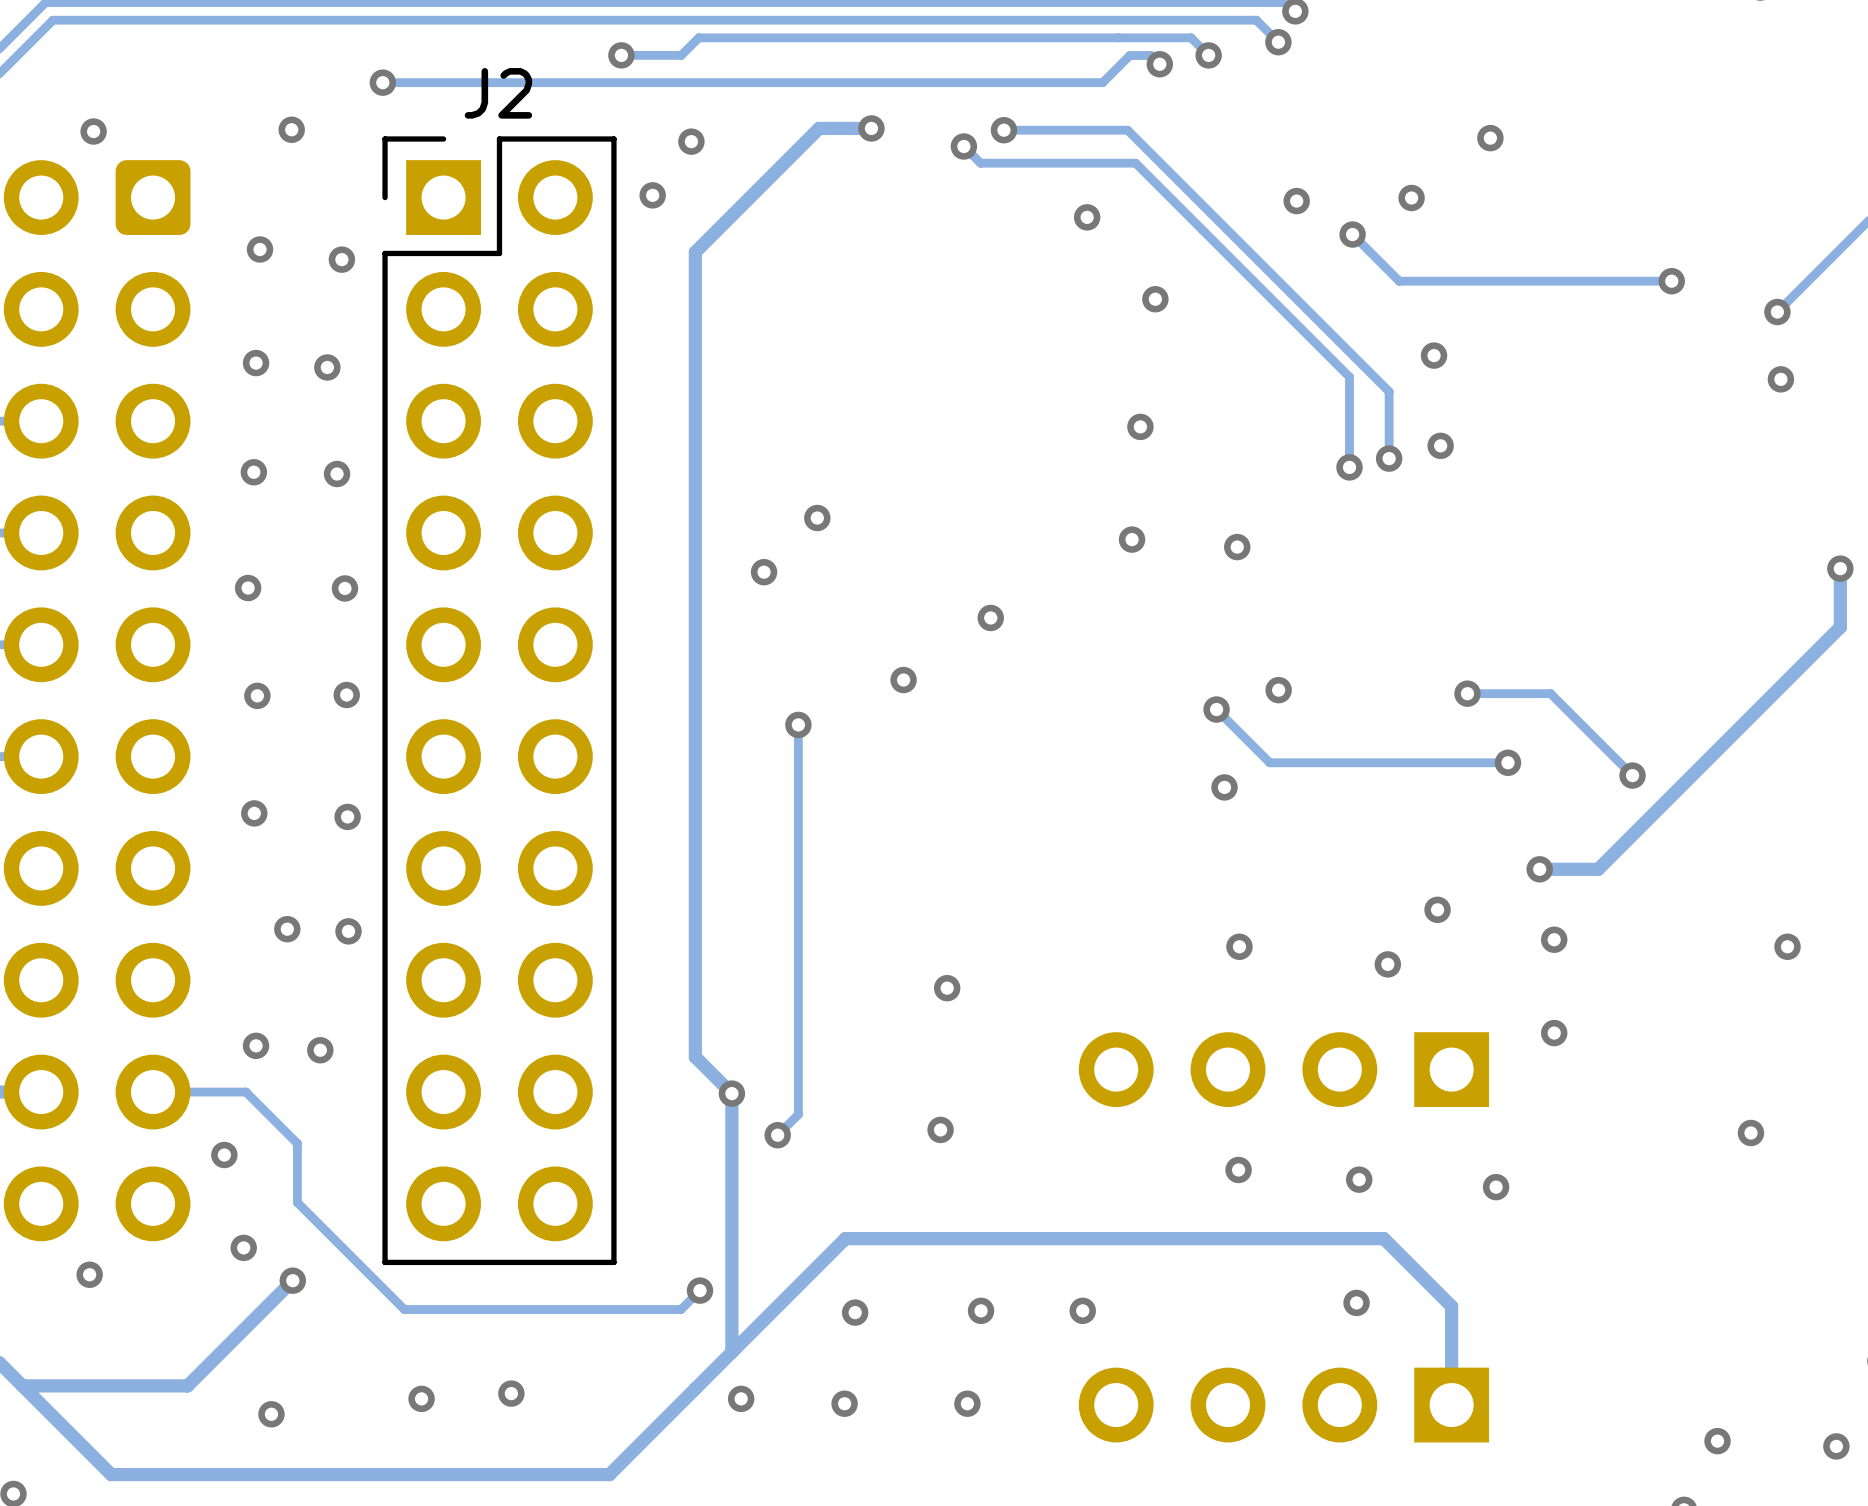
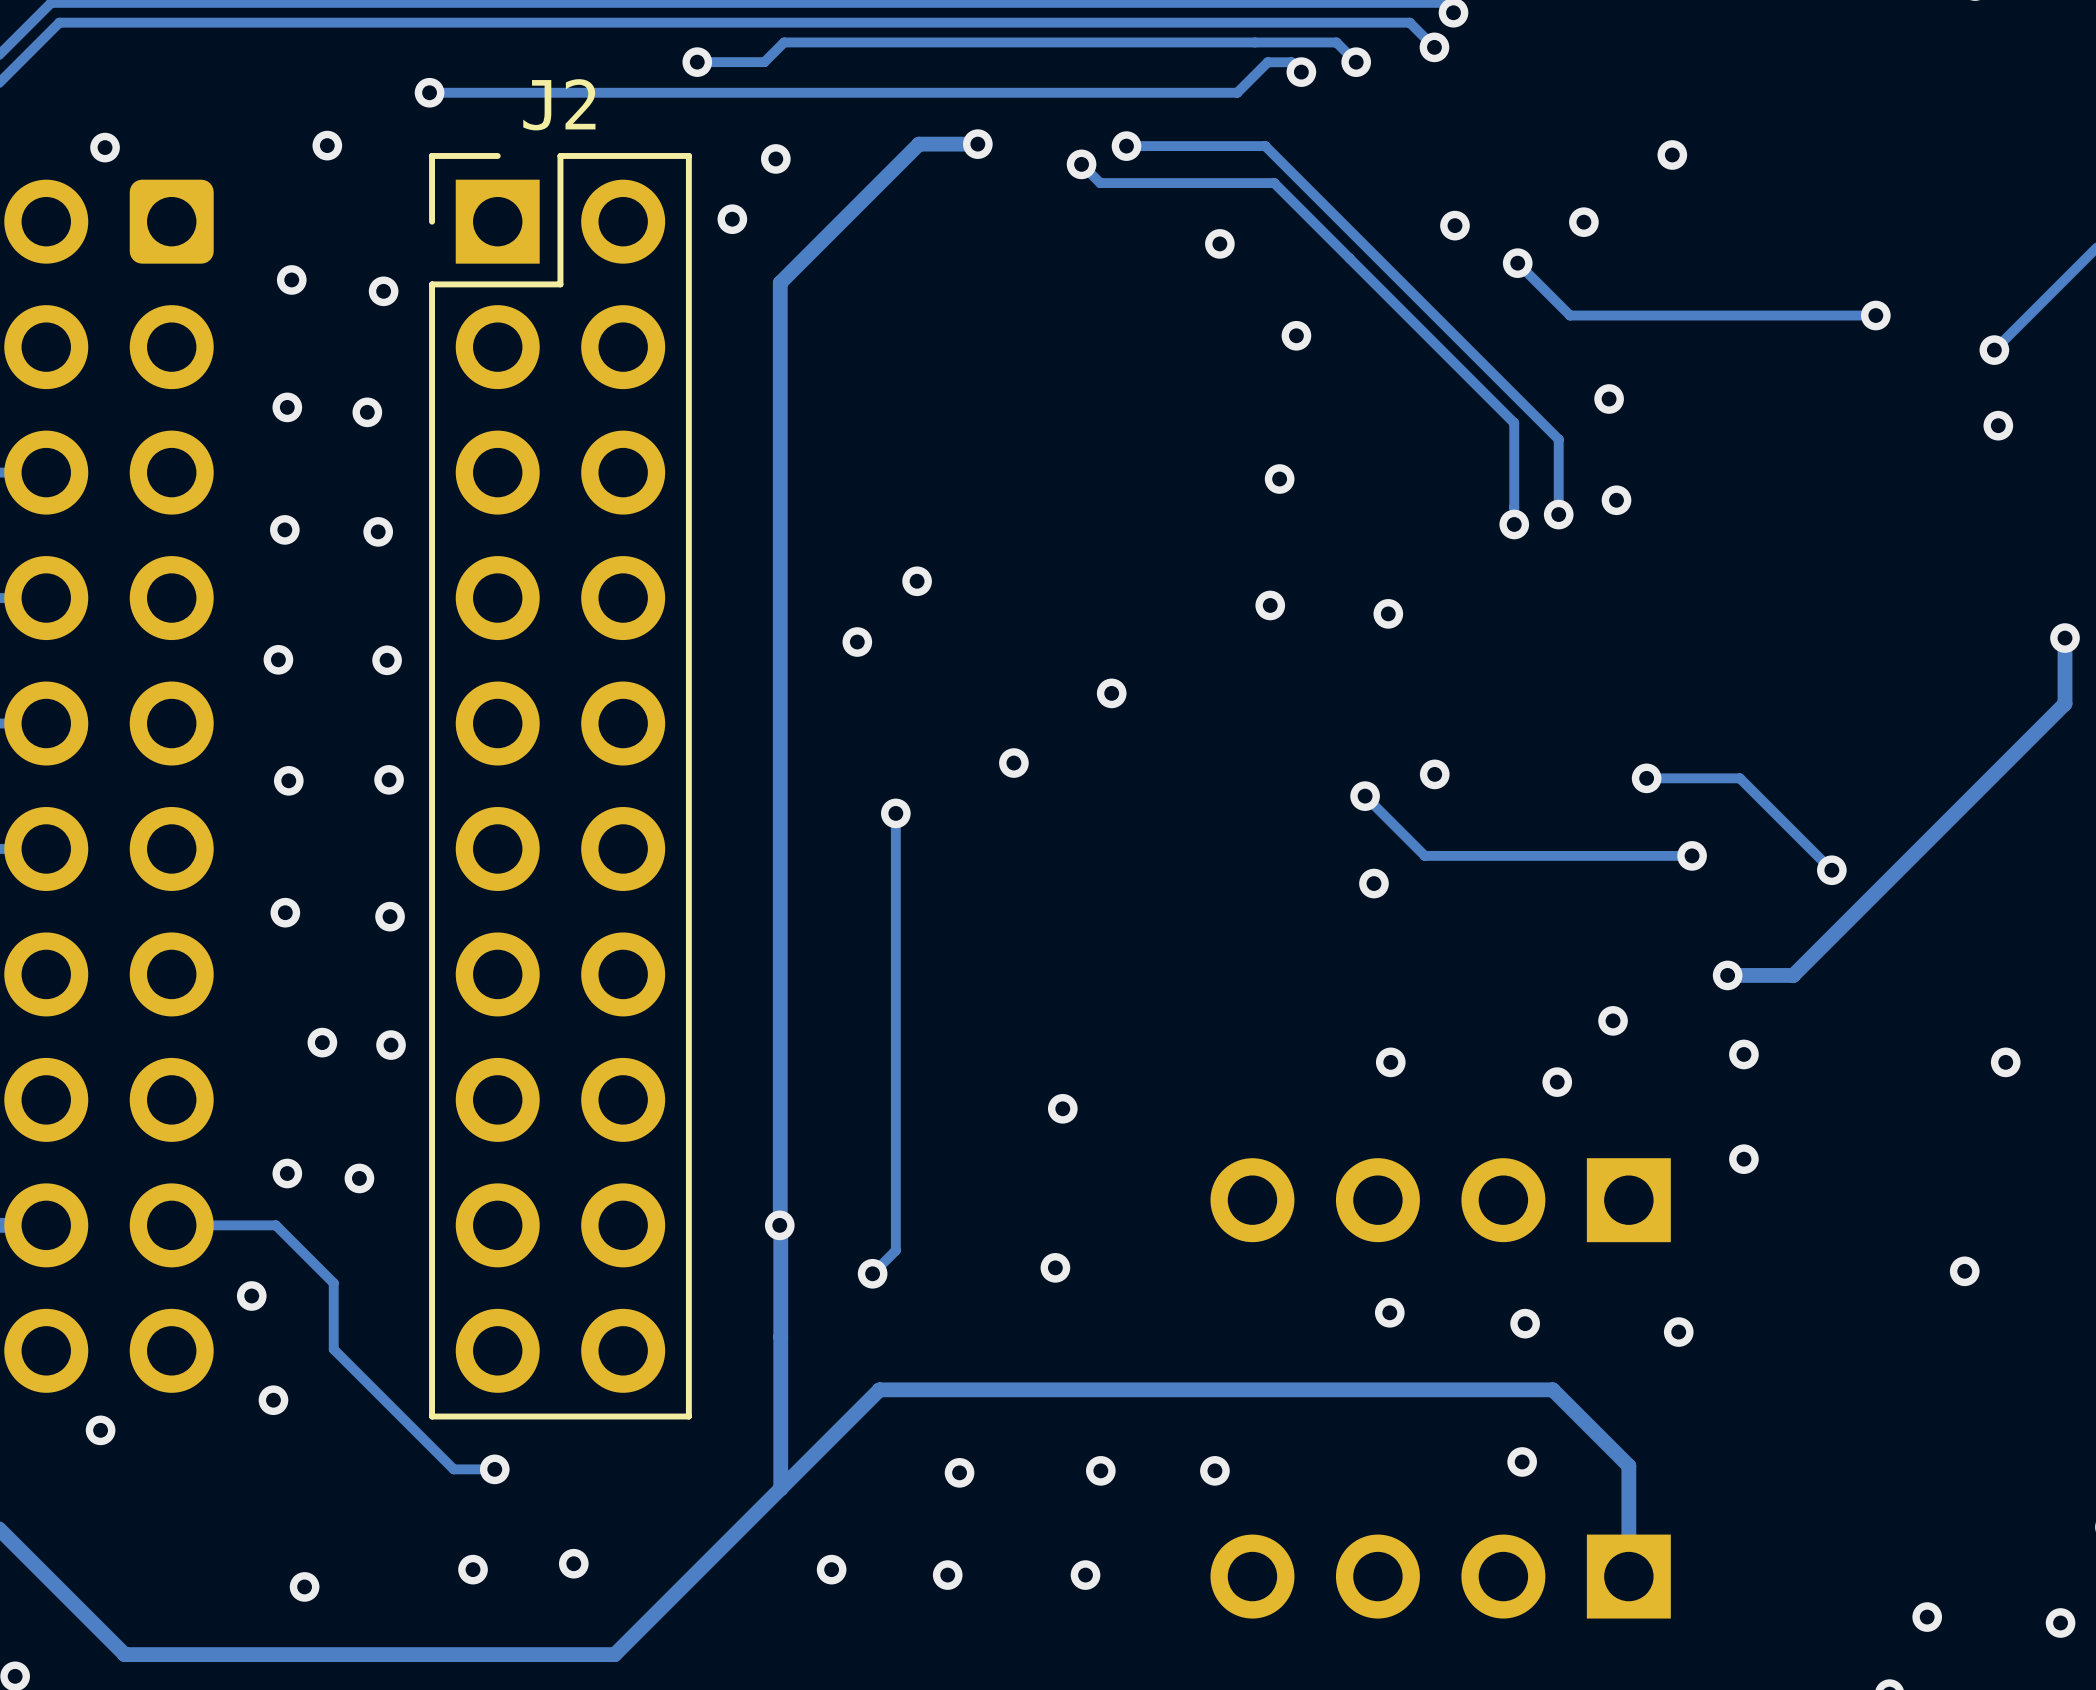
track: (695, 1057) (731, 1093) (731, 1352) -> (780, 1186) (780, 1224)
track: none -> (779, 1225) (780, 1488)
via position: (731, 1093) -> (779, 1225)
track: (845, 1238) (609, 1474) (547, 1474) -> (948, 1389) (879, 1389) (614, 1654)
track: (292, 1280) (187, 1385) (22, 1385) -> none
via: (292, 1280) -> none
track: (699, 1290) (681, 1309) (440, 1309) -> none
via: (699, 1290) -> none
via: none -> (494, 1469)

